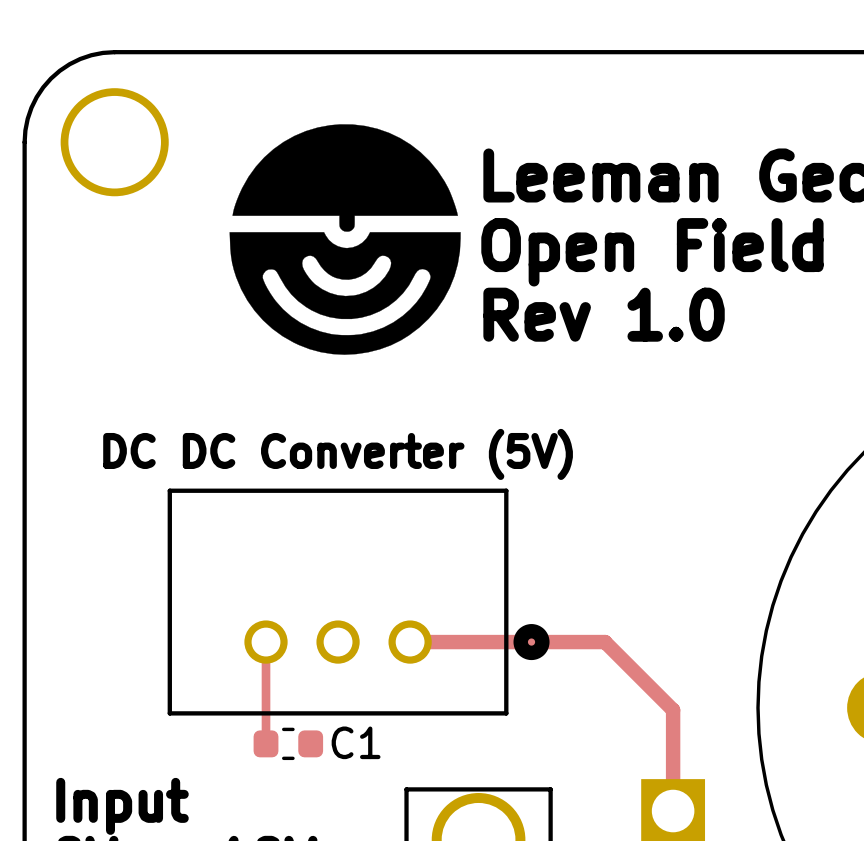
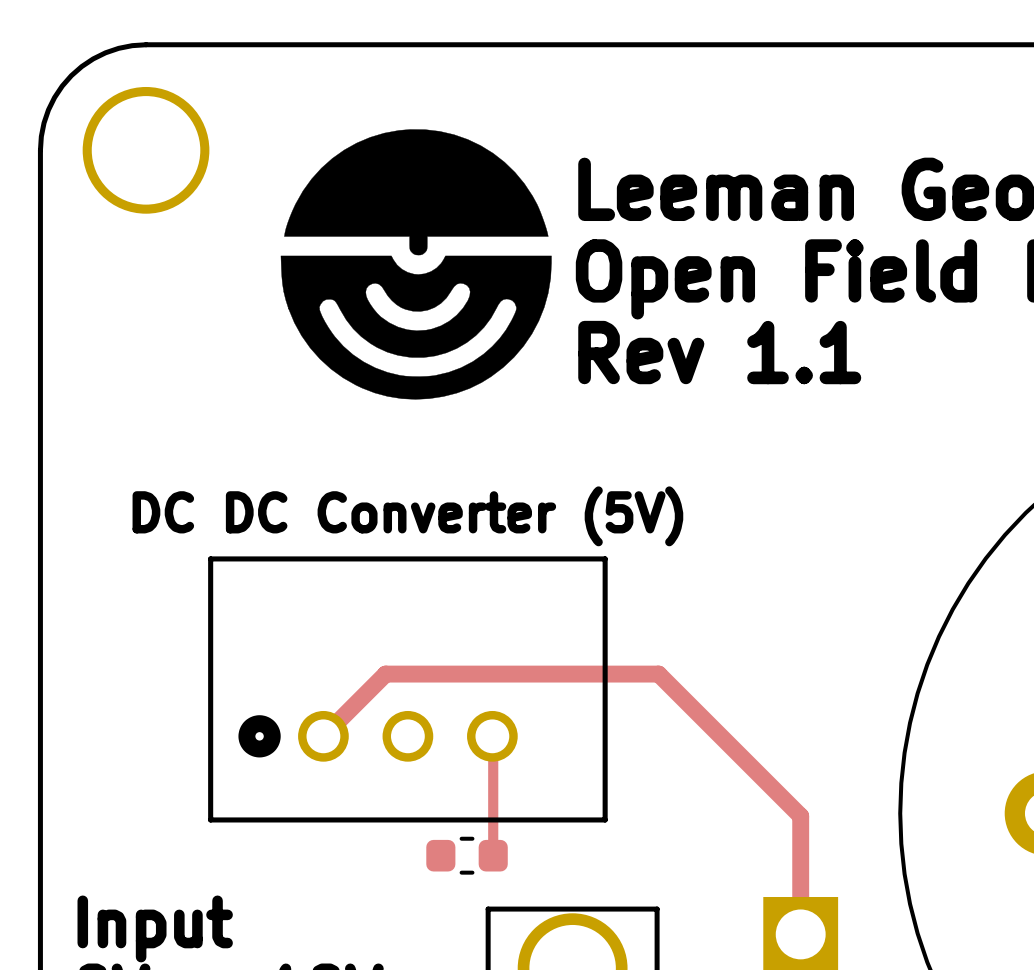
text: Rev 1.0 (604, 314) -> Rev 1.1 (719, 352)
part footprint: [167, 488, 550, 716] -> [208, 556, 608, 823]
track: (266, 642) (266, 743) -> none
track: (410, 642) (605, 642) -> (323, 736) (385, 674) (658, 674) (720, 736)
track: none -> (492, 736) (493, 855)
C1: (288, 743) -> none
part: none -> (467, 855)

